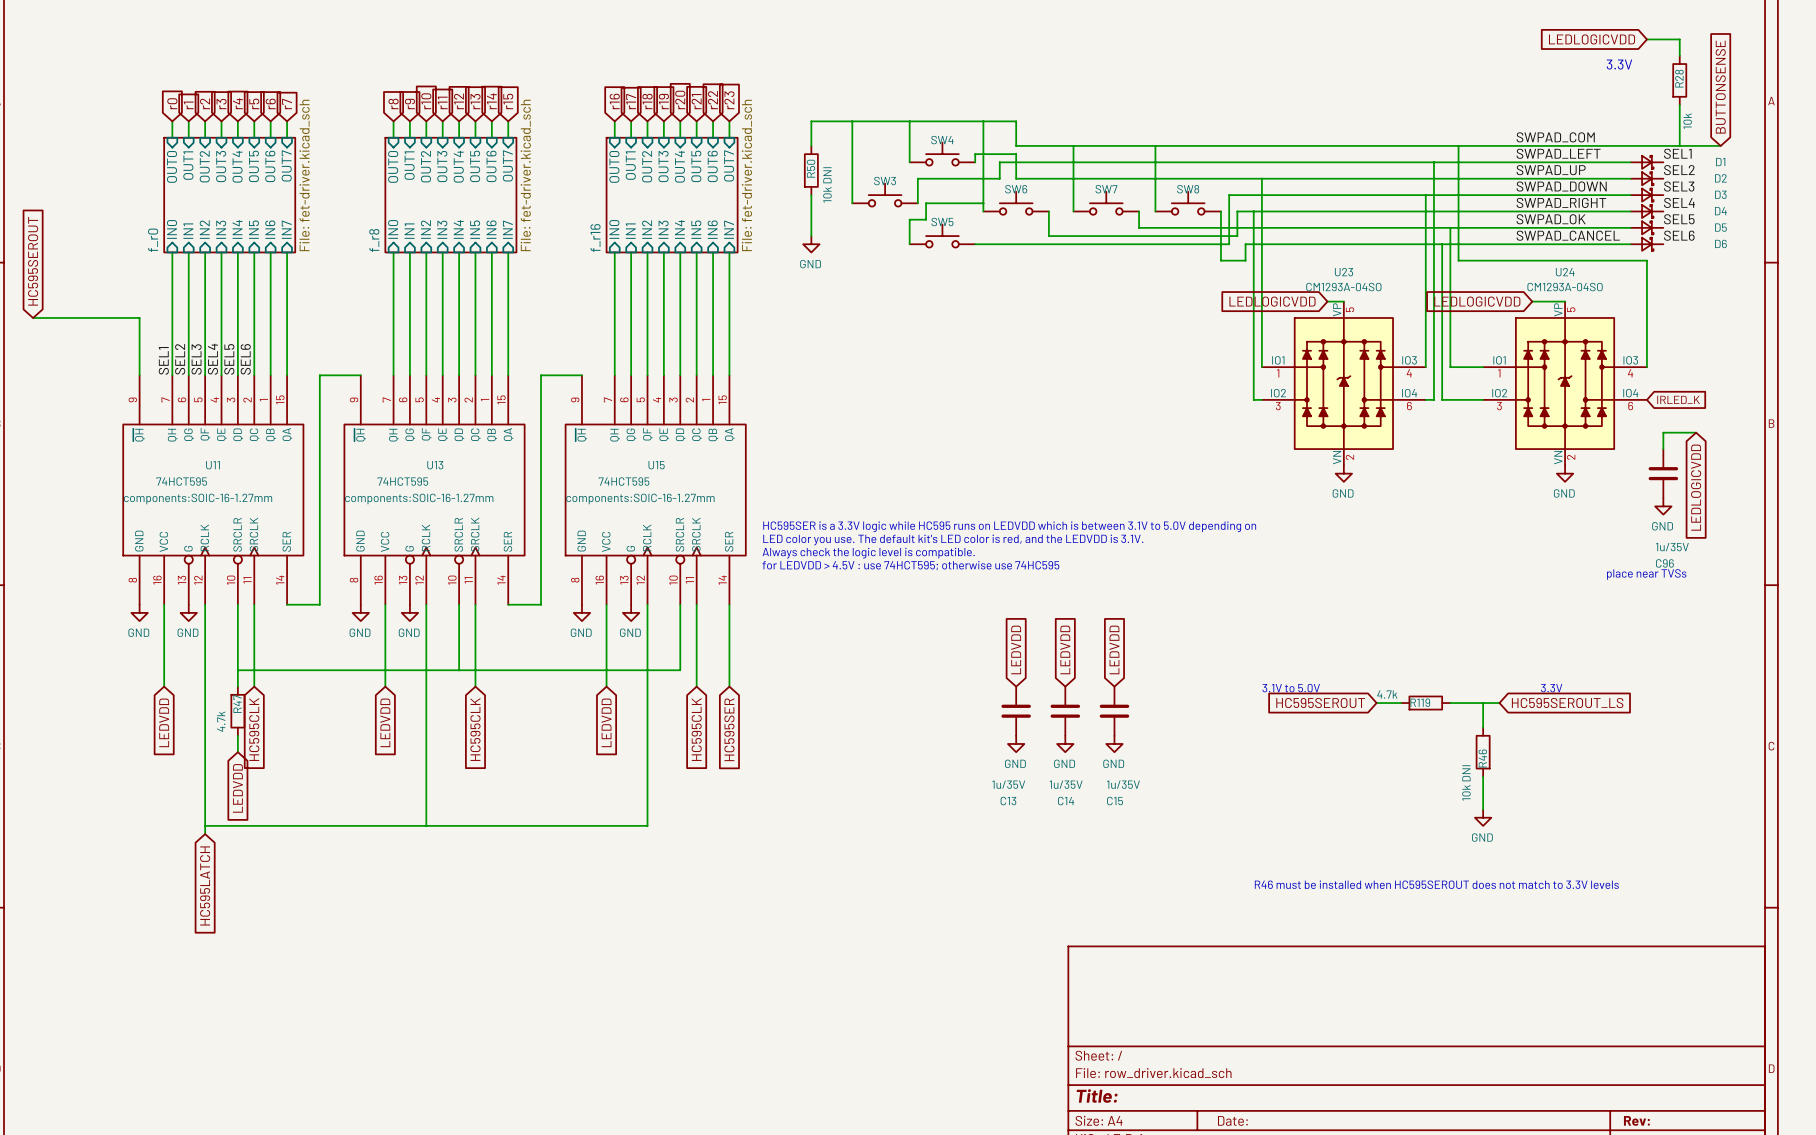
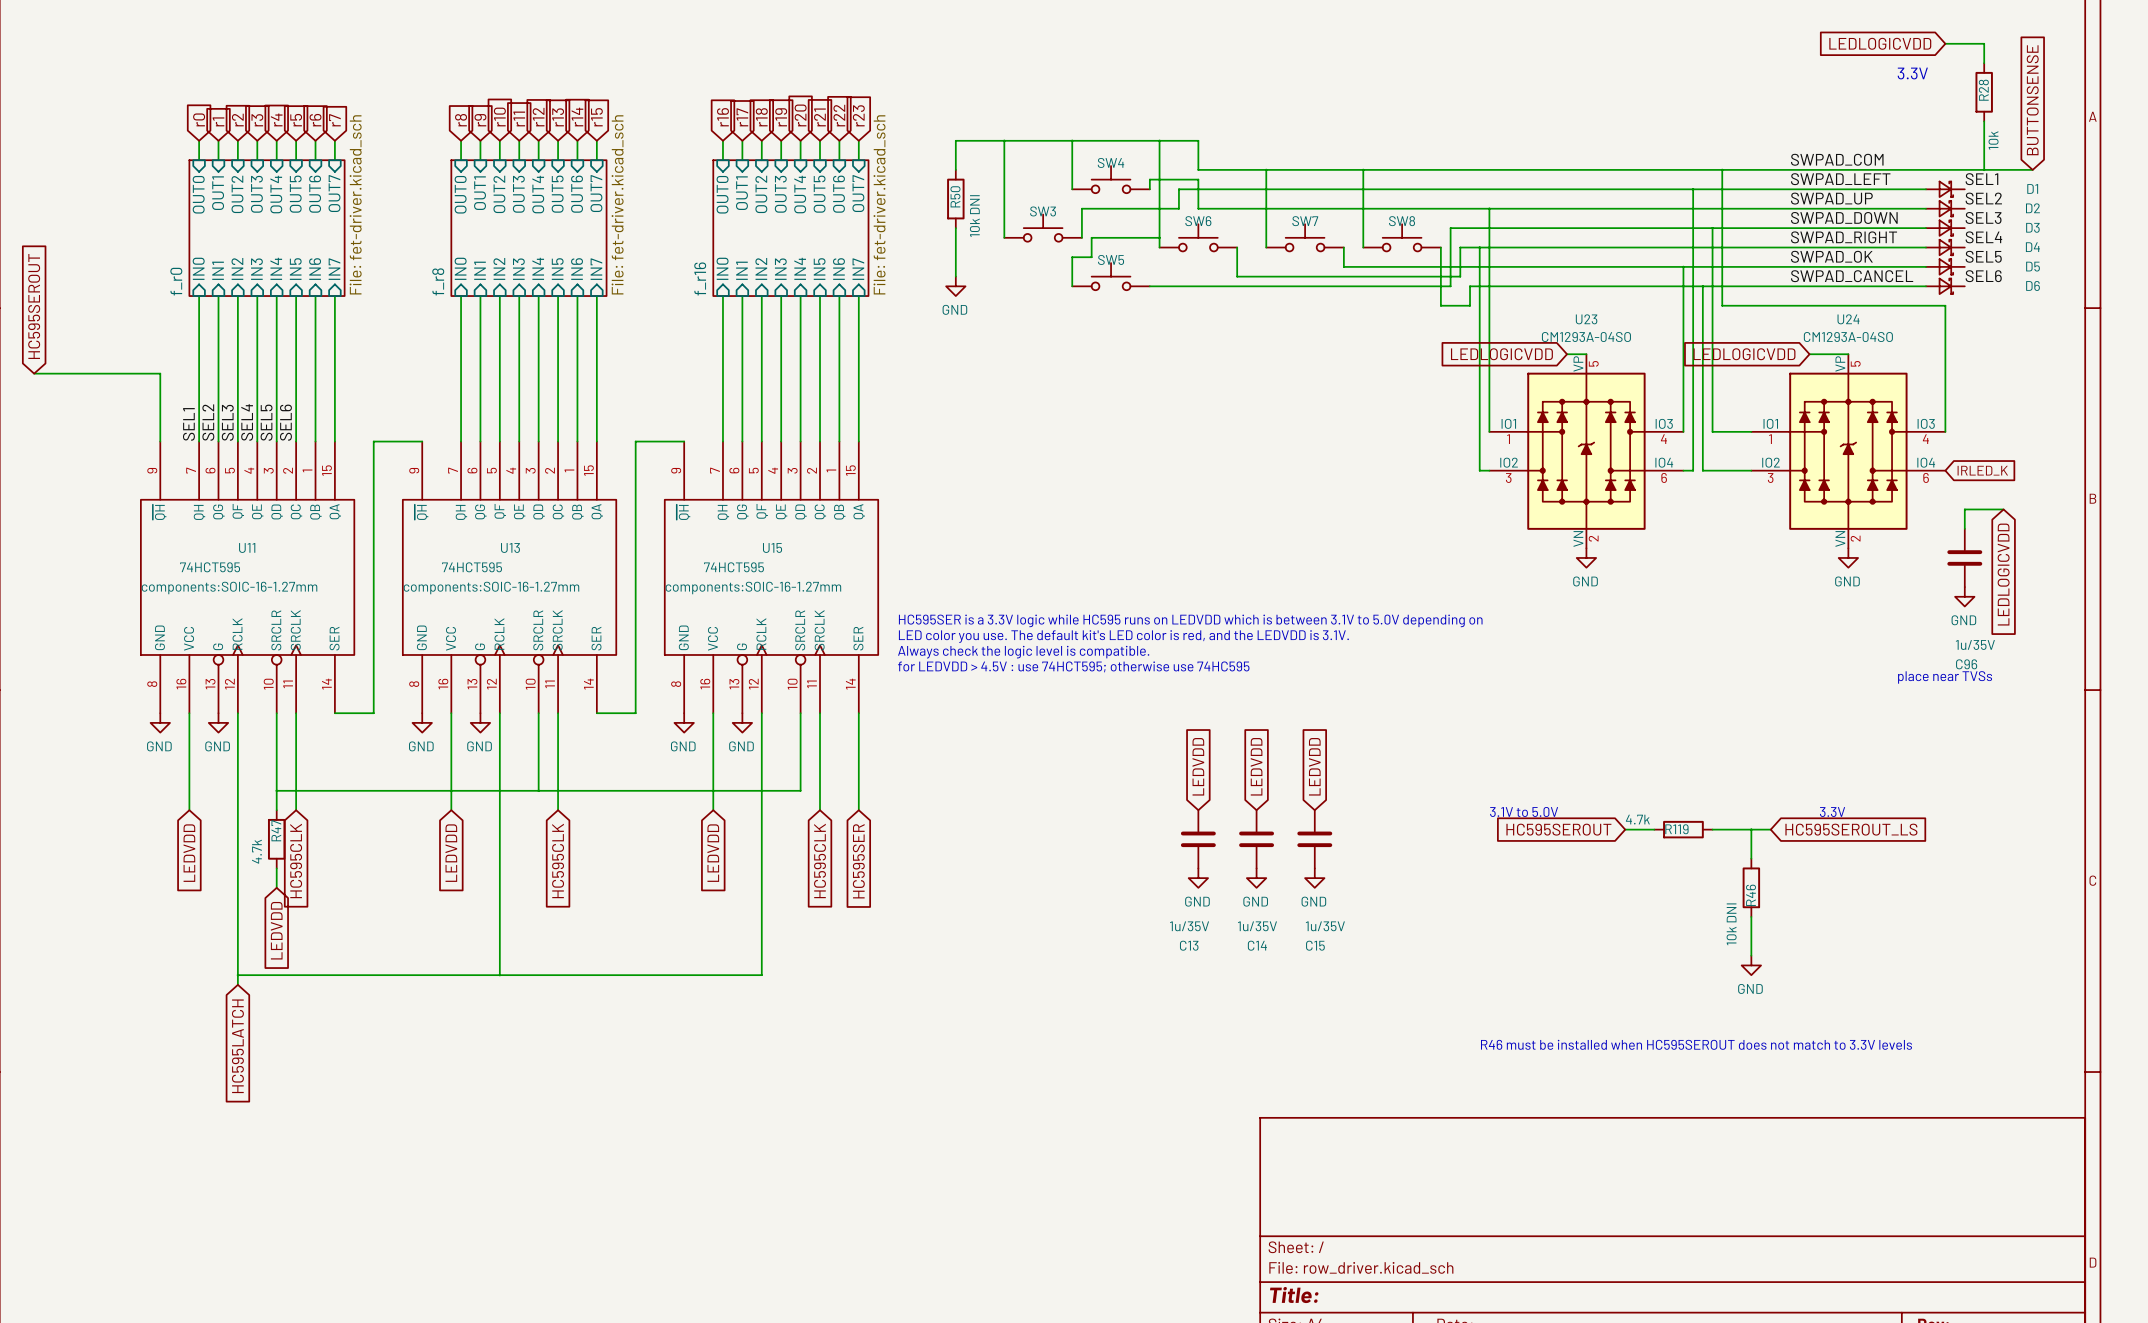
wire: (1425, 195) (1425, 227) -> (1712, 228) (1712, 266)

